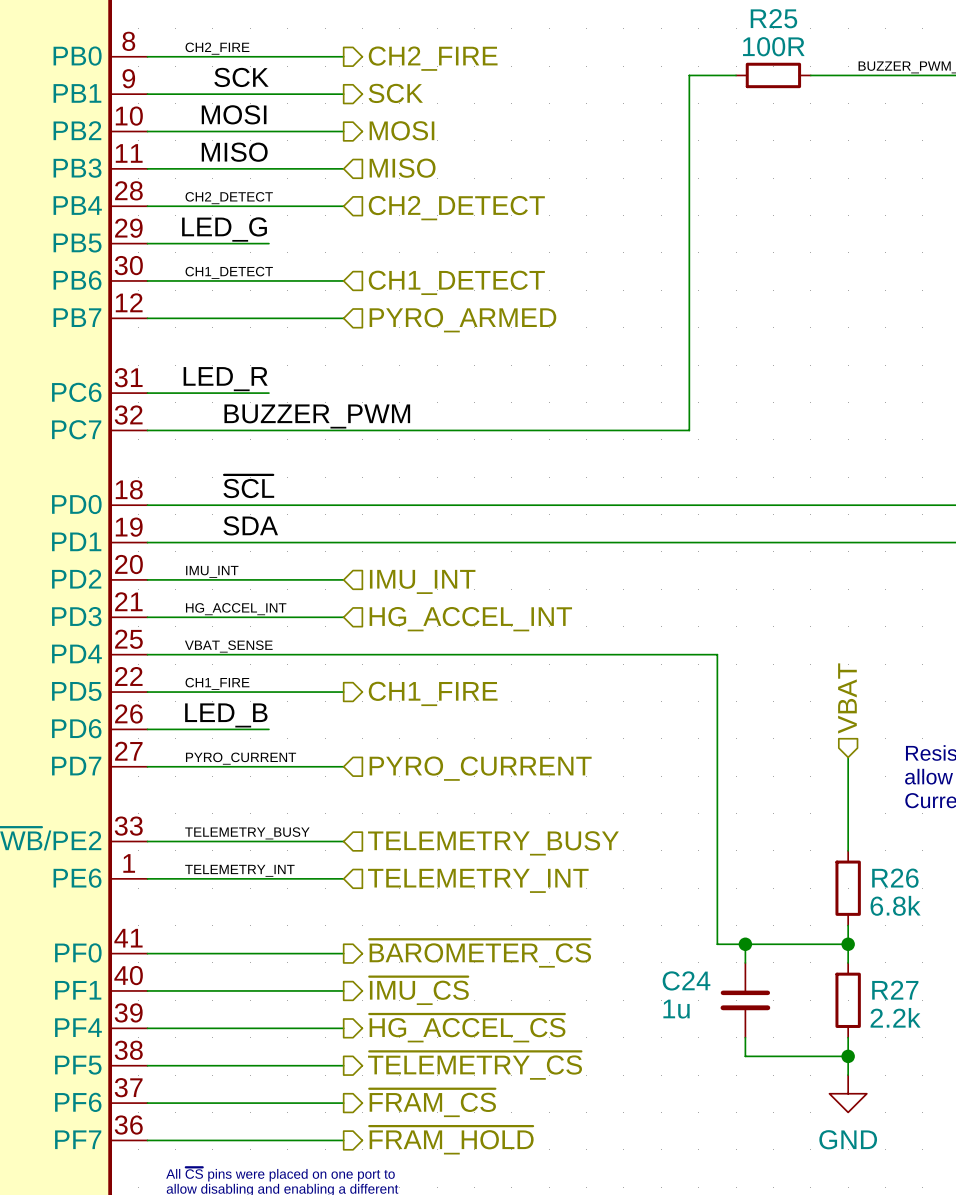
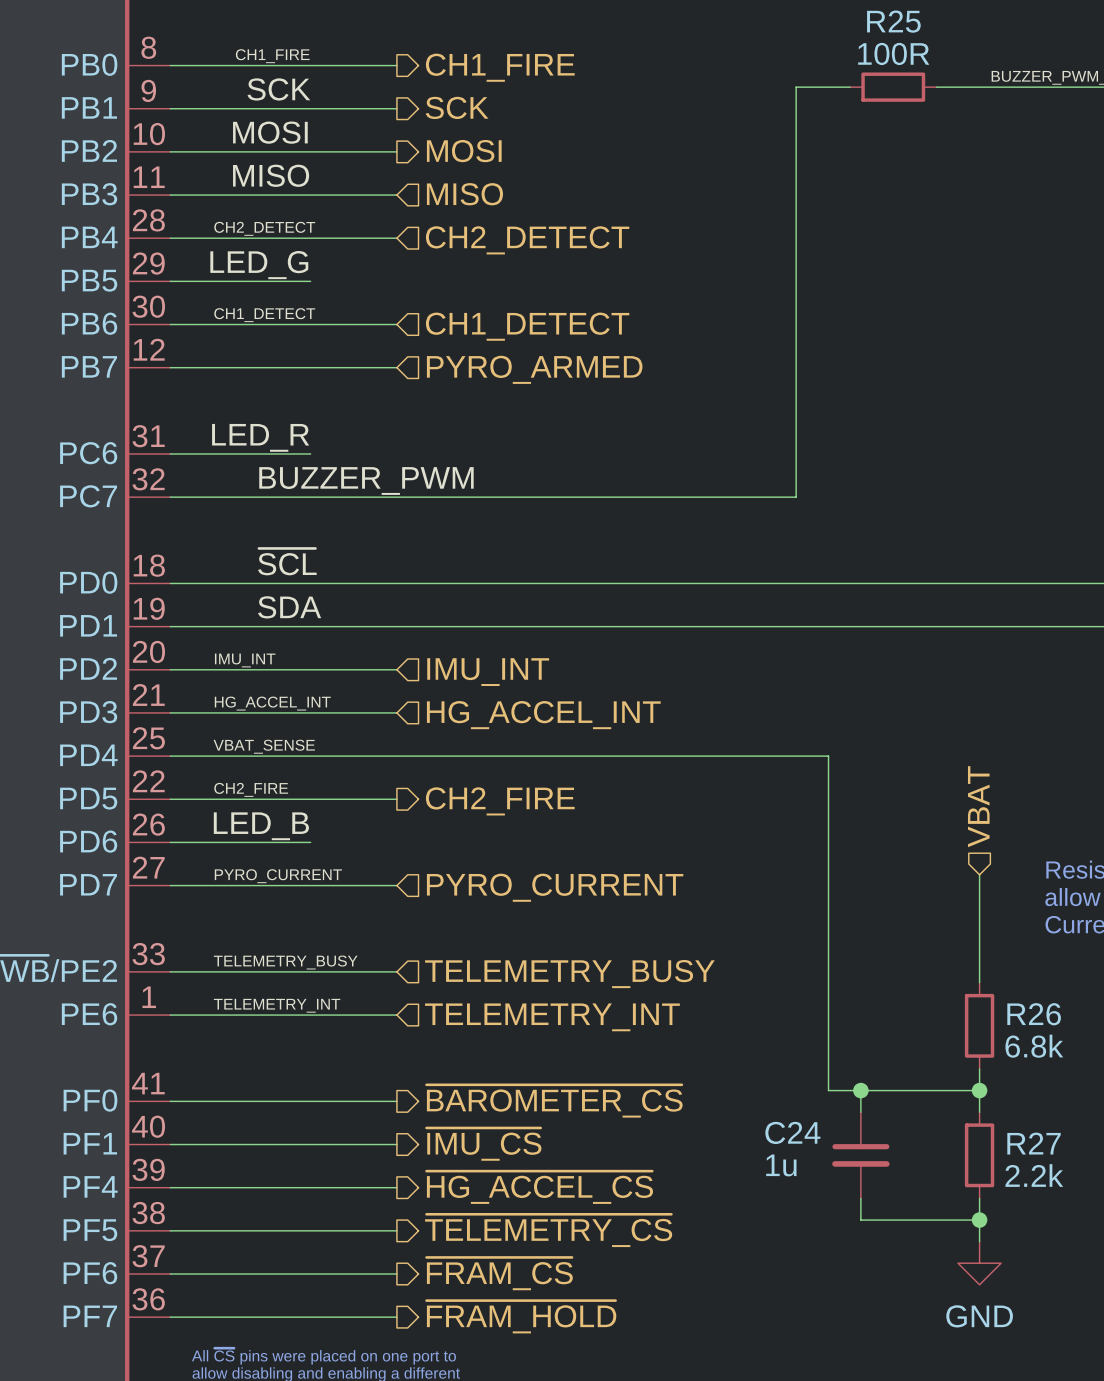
label: CH2_FIRE (217, 48) -> CH1_FIRE (272, 56)
hierarchical label: CH2_FIRE (433, 58) -> CH1_FIRE (500, 67)
label: CH1_FIRE (217, 683) -> CH2_FIRE (251, 789)
hierarchical label: CH1_FIRE (433, 693) -> CH2_FIRE (500, 801)

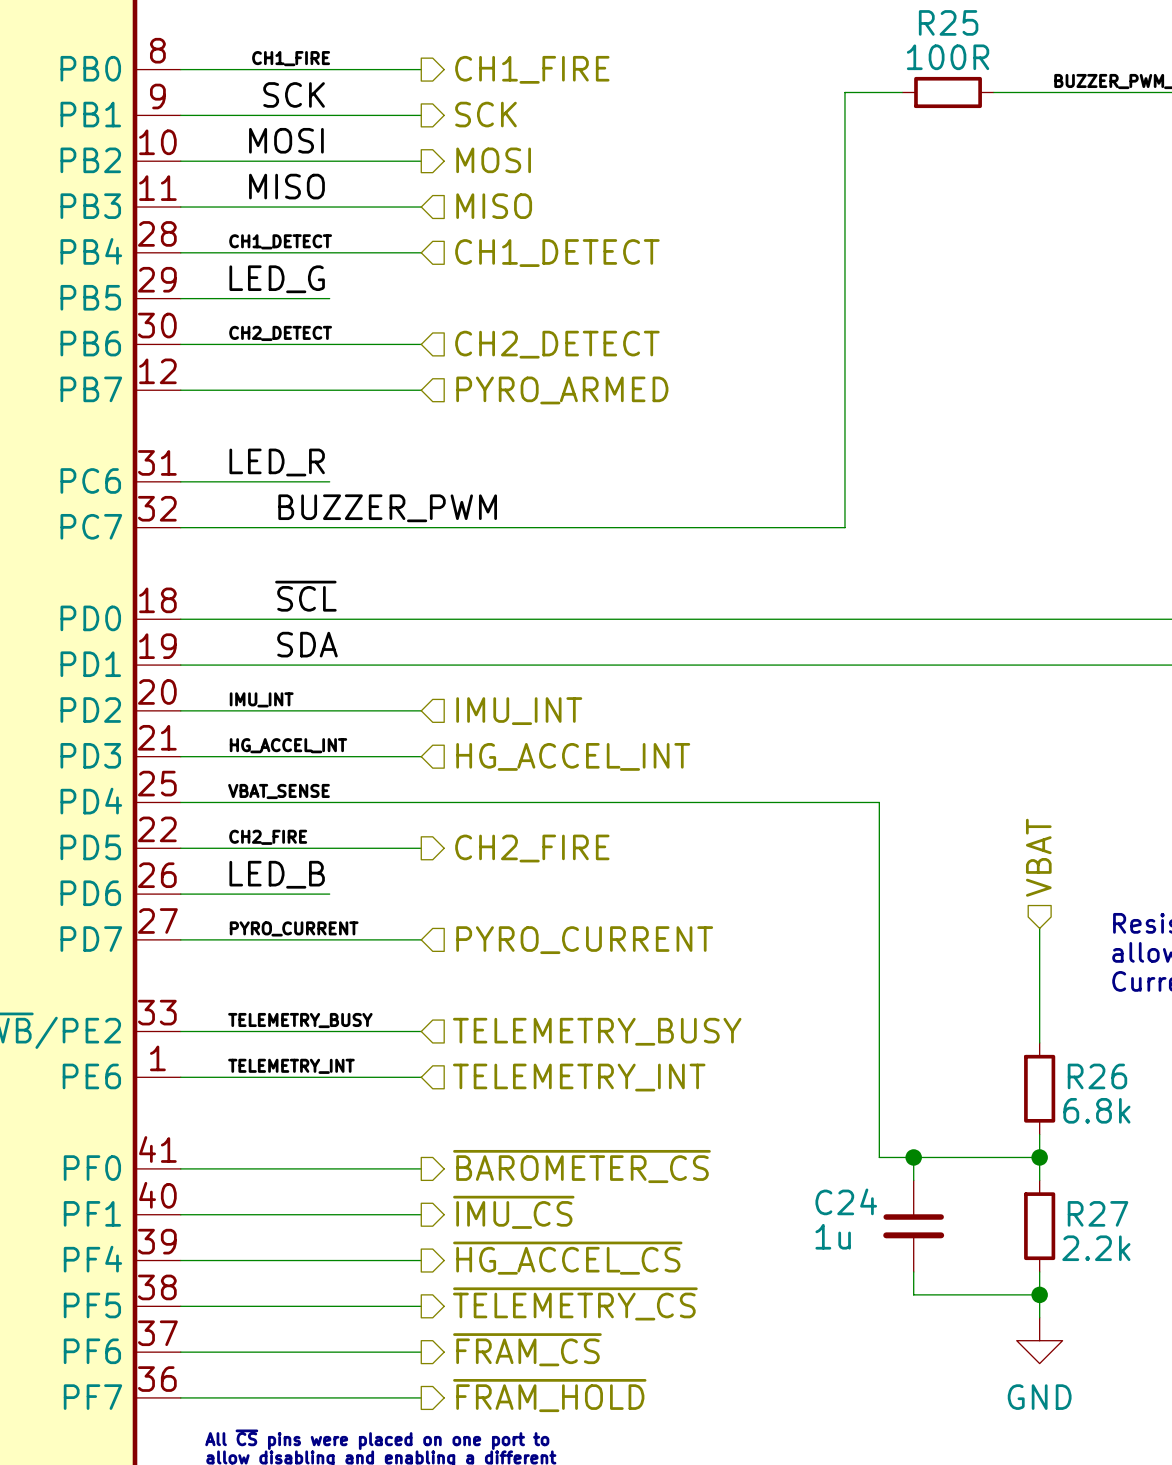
label: CH2_DETECT (264, 228) -> CH1_DETECT (280, 241)
hierarchical label: CH2_DETECT (527, 240) -> CH1_DETECT (557, 253)
label: CH1_DETECT (264, 315) -> CH2_DETECT (280, 333)
hierarchical label: CH1_DETECT (527, 326) -> CH2_DETECT (557, 344)

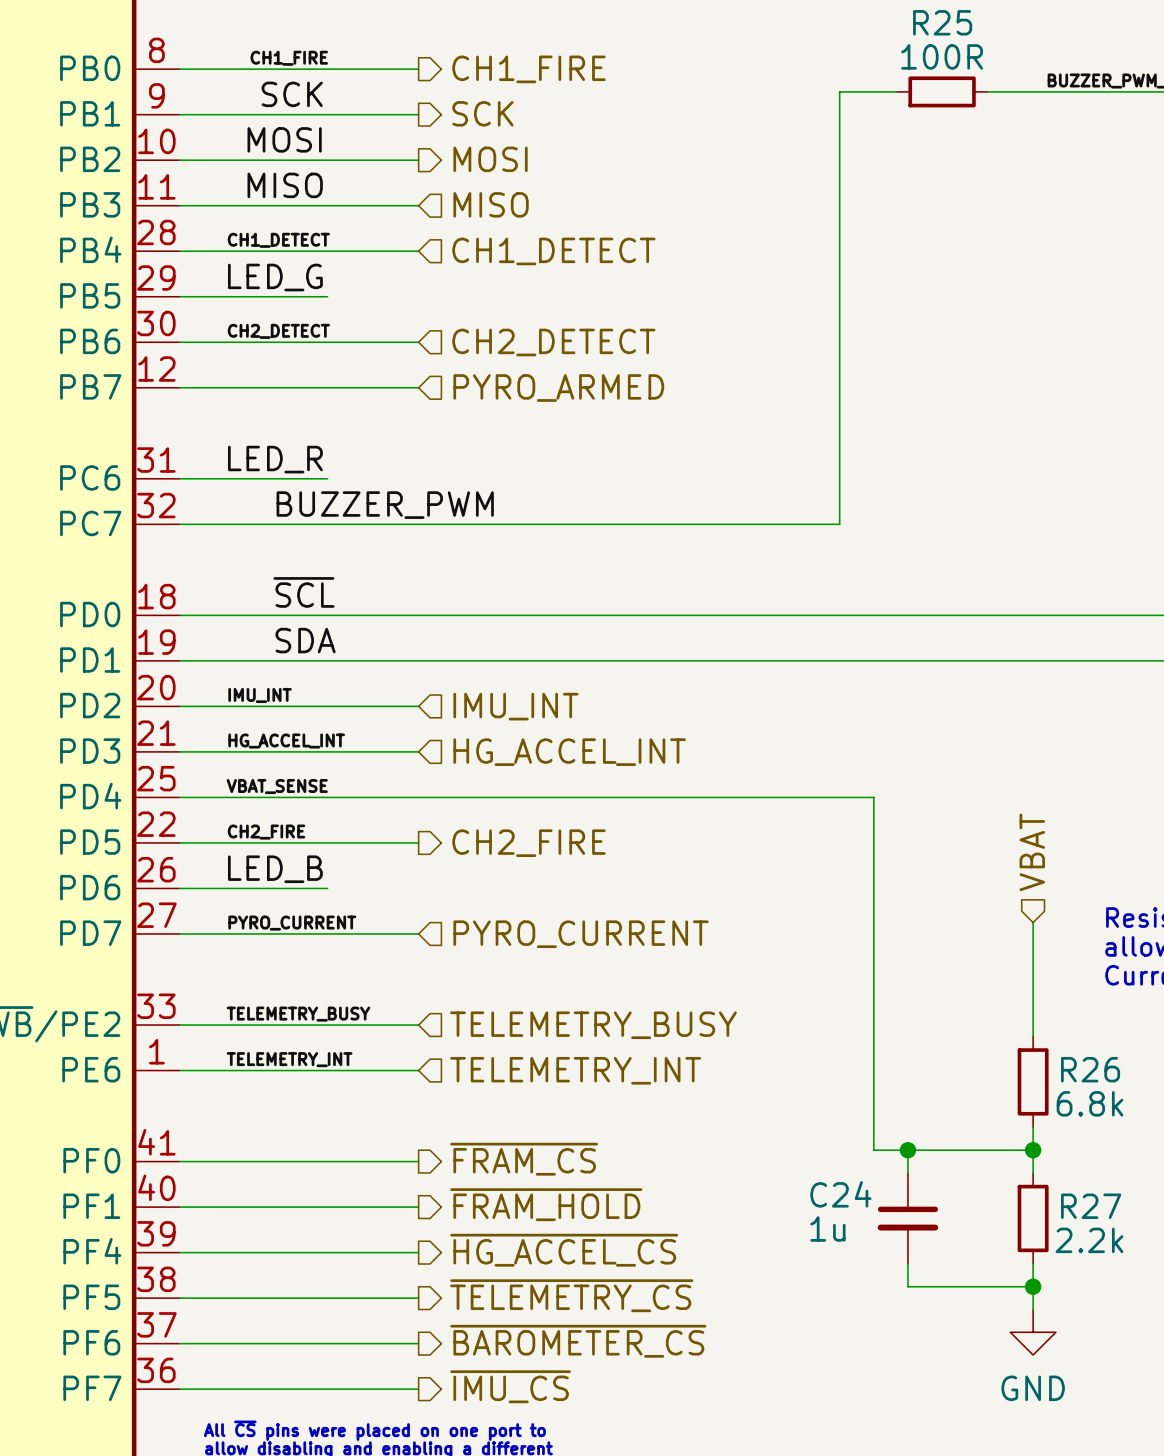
hierarchical label: ~{BAROMETER_CS} (581, 1166) -> ~{FRAM_CS} (524, 1159)
hierarchical label: ~{IMU_CS} (513, 1212) -> ~{FRAM_HOLD} (546, 1204)
hierarchical label: ~{FRAM_CS} (527, 1349) -> ~{BAROMETER_CS} (578, 1341)
hierarchical label: ~{FRAM_HOLD} (549, 1395) -> ~{IMU_CS} (510, 1386)

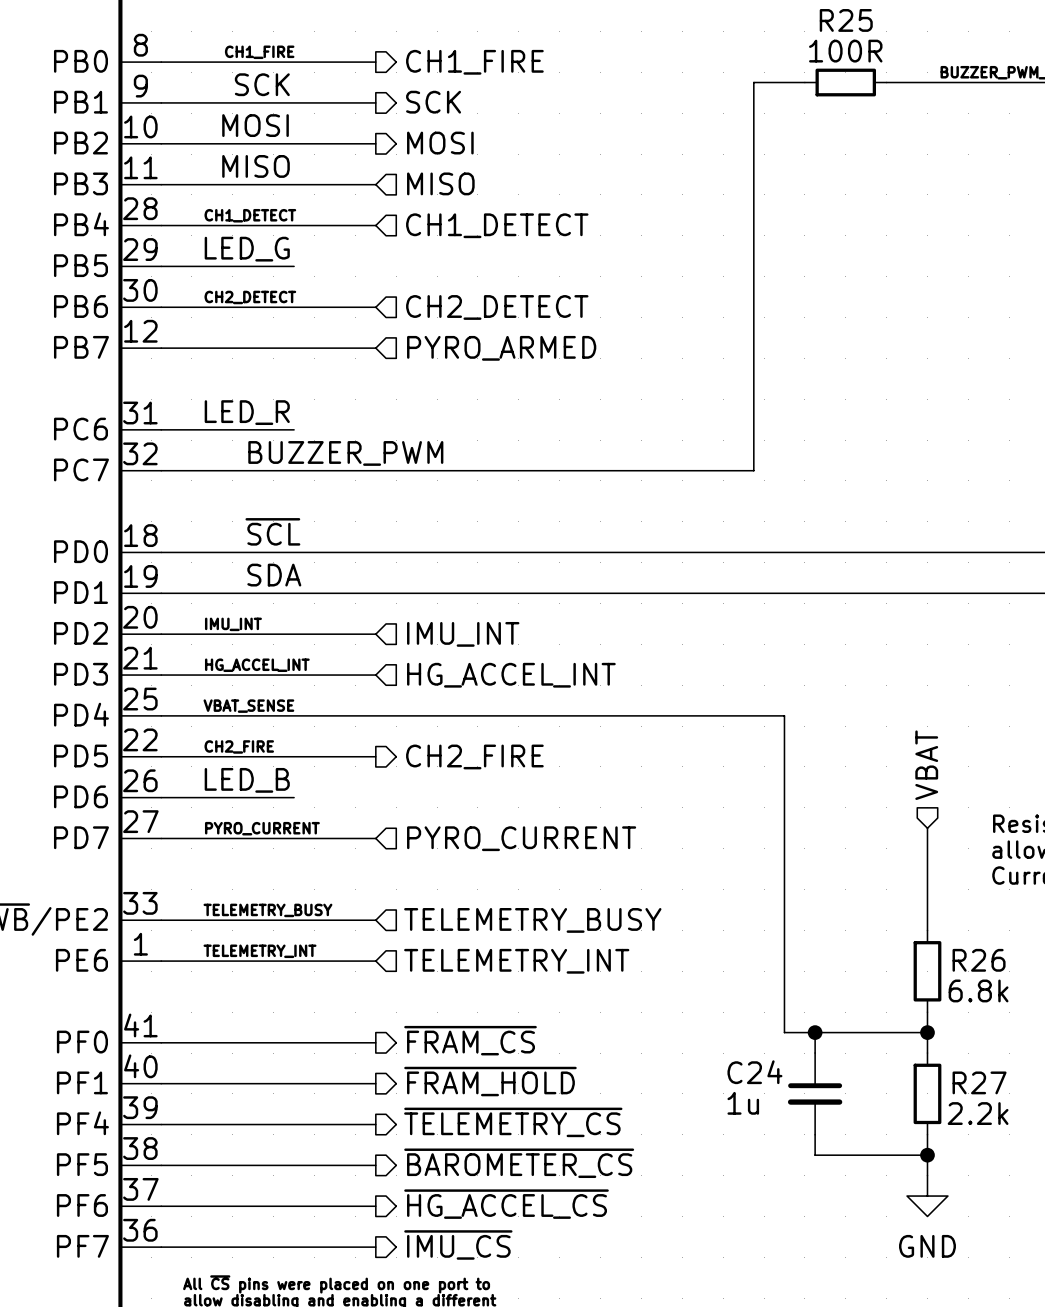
hierarchical label: ~{HG_ACCEL_CS} (564, 1250) -> ~{TELEMETRY_CS} (513, 1122)
hierarchical label: ~{TELEMETRY_CS} (571, 1295) -> ~{BAROMETER_CS} (519, 1163)
hierarchical label: ~{BAROMETER_CS} (578, 1341) -> ~{HG_ACCEL_CS} (506, 1204)

